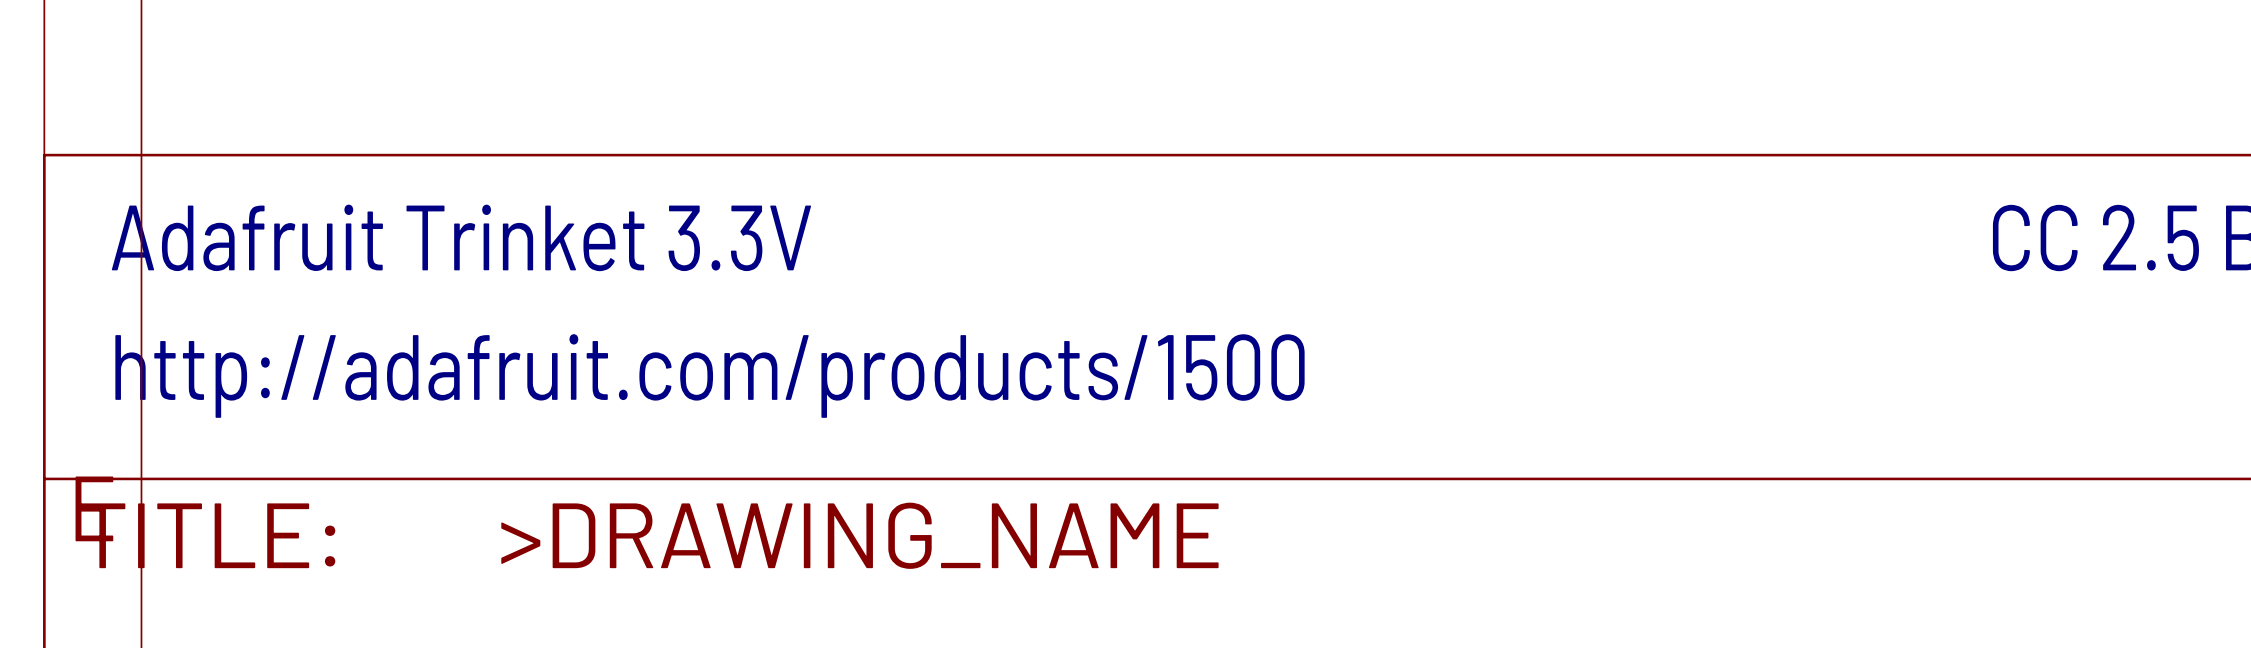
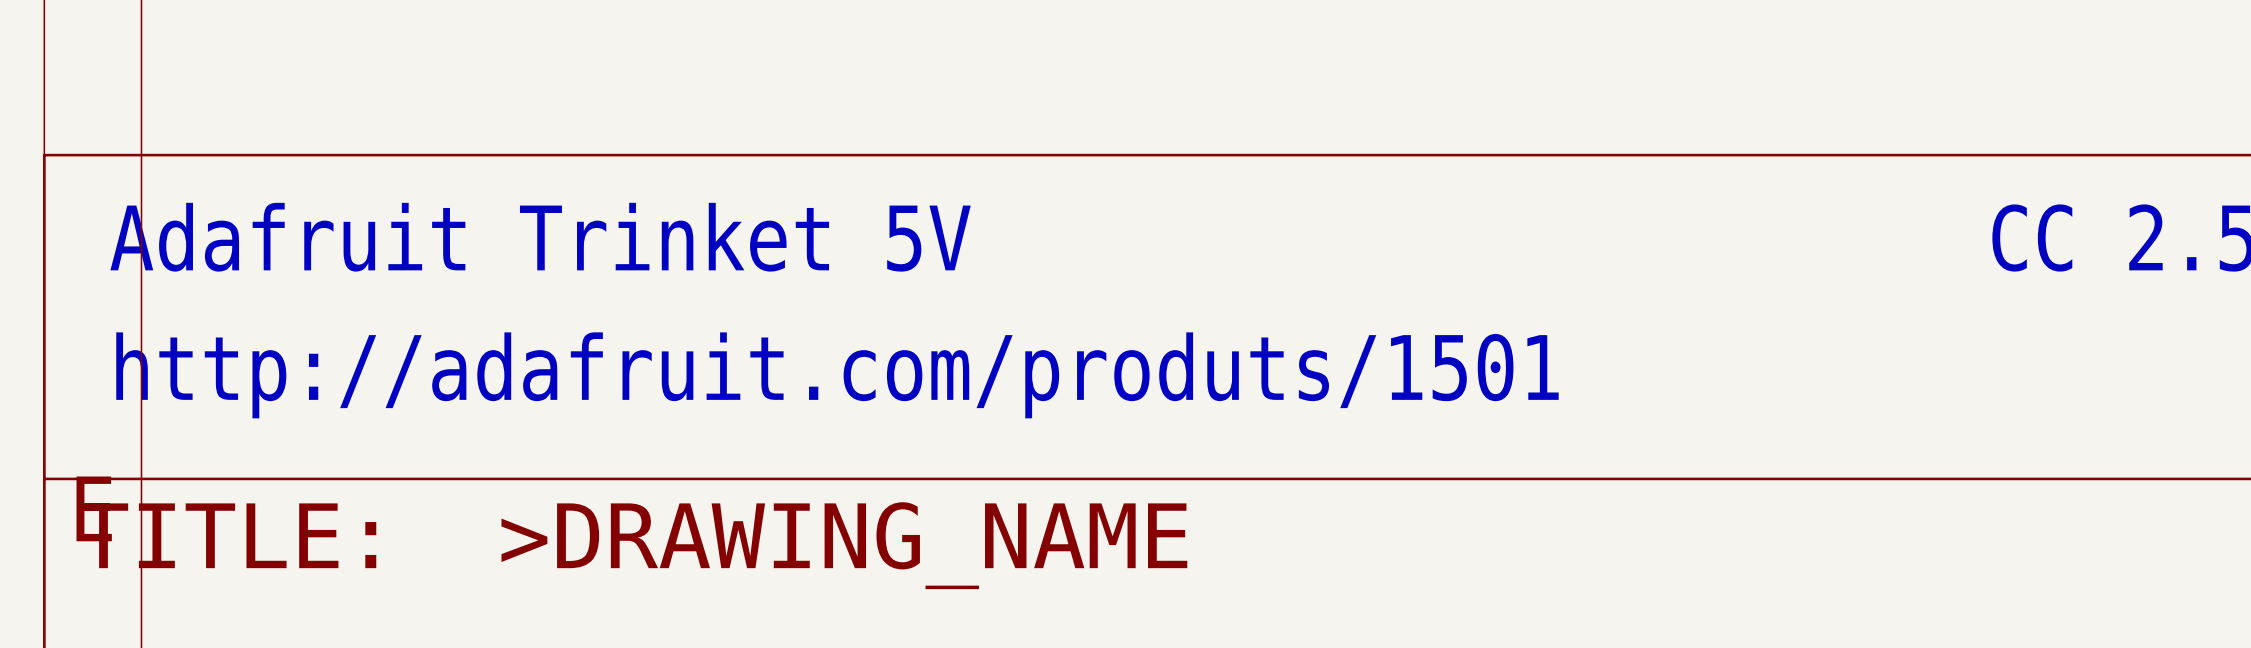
text: Adafruit Trinket 3.3V (461, 237) -> Adafruit Trinket 5V (540, 237)
text: http://adafruit.com/products/1500 (710, 376) -> http://adafruit.com/produts/1501 (837, 375)

